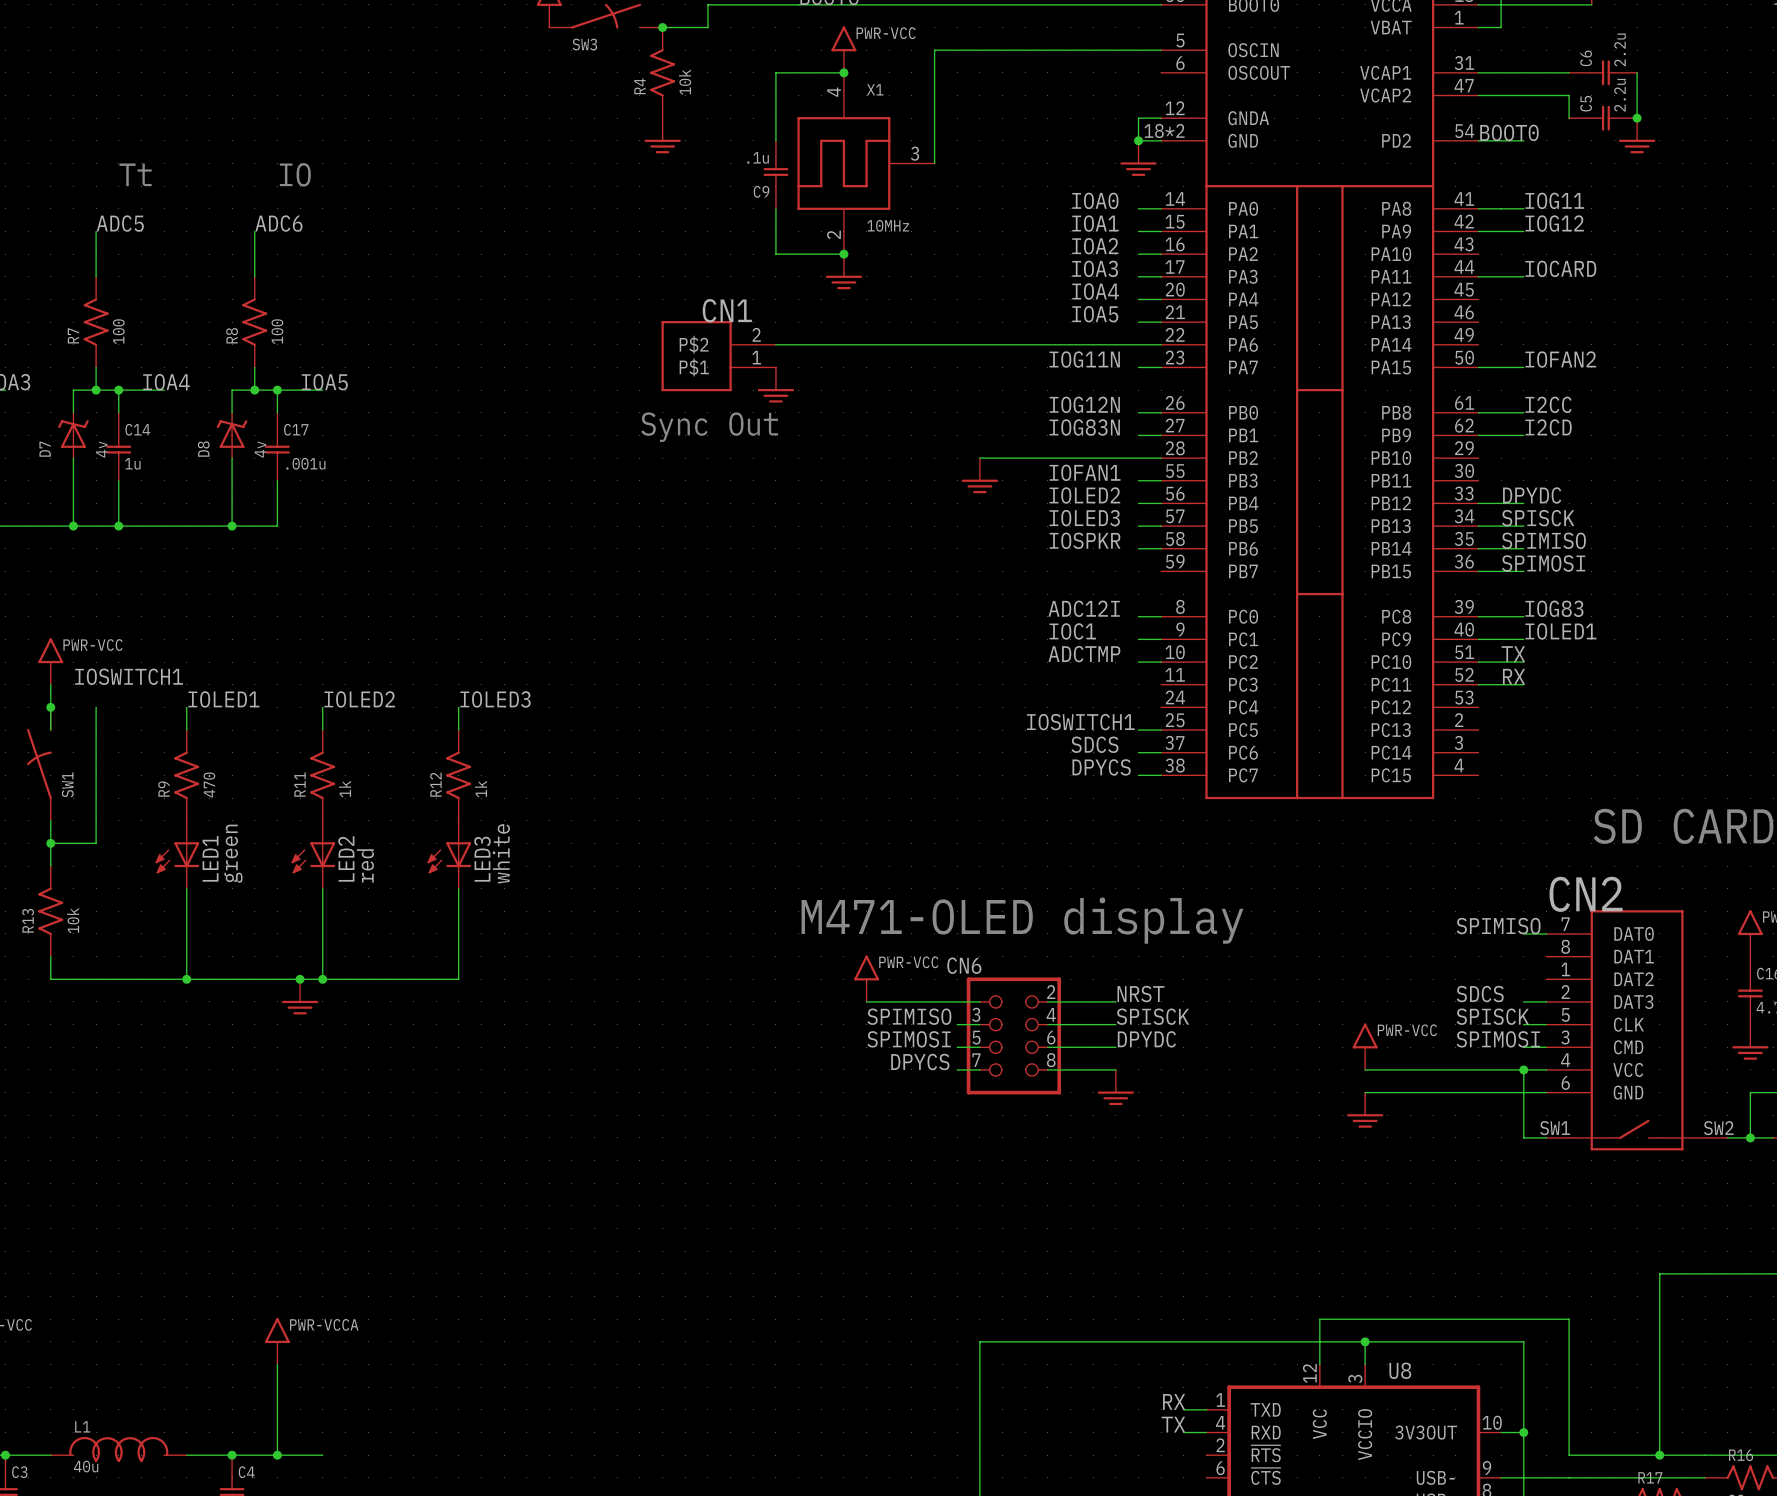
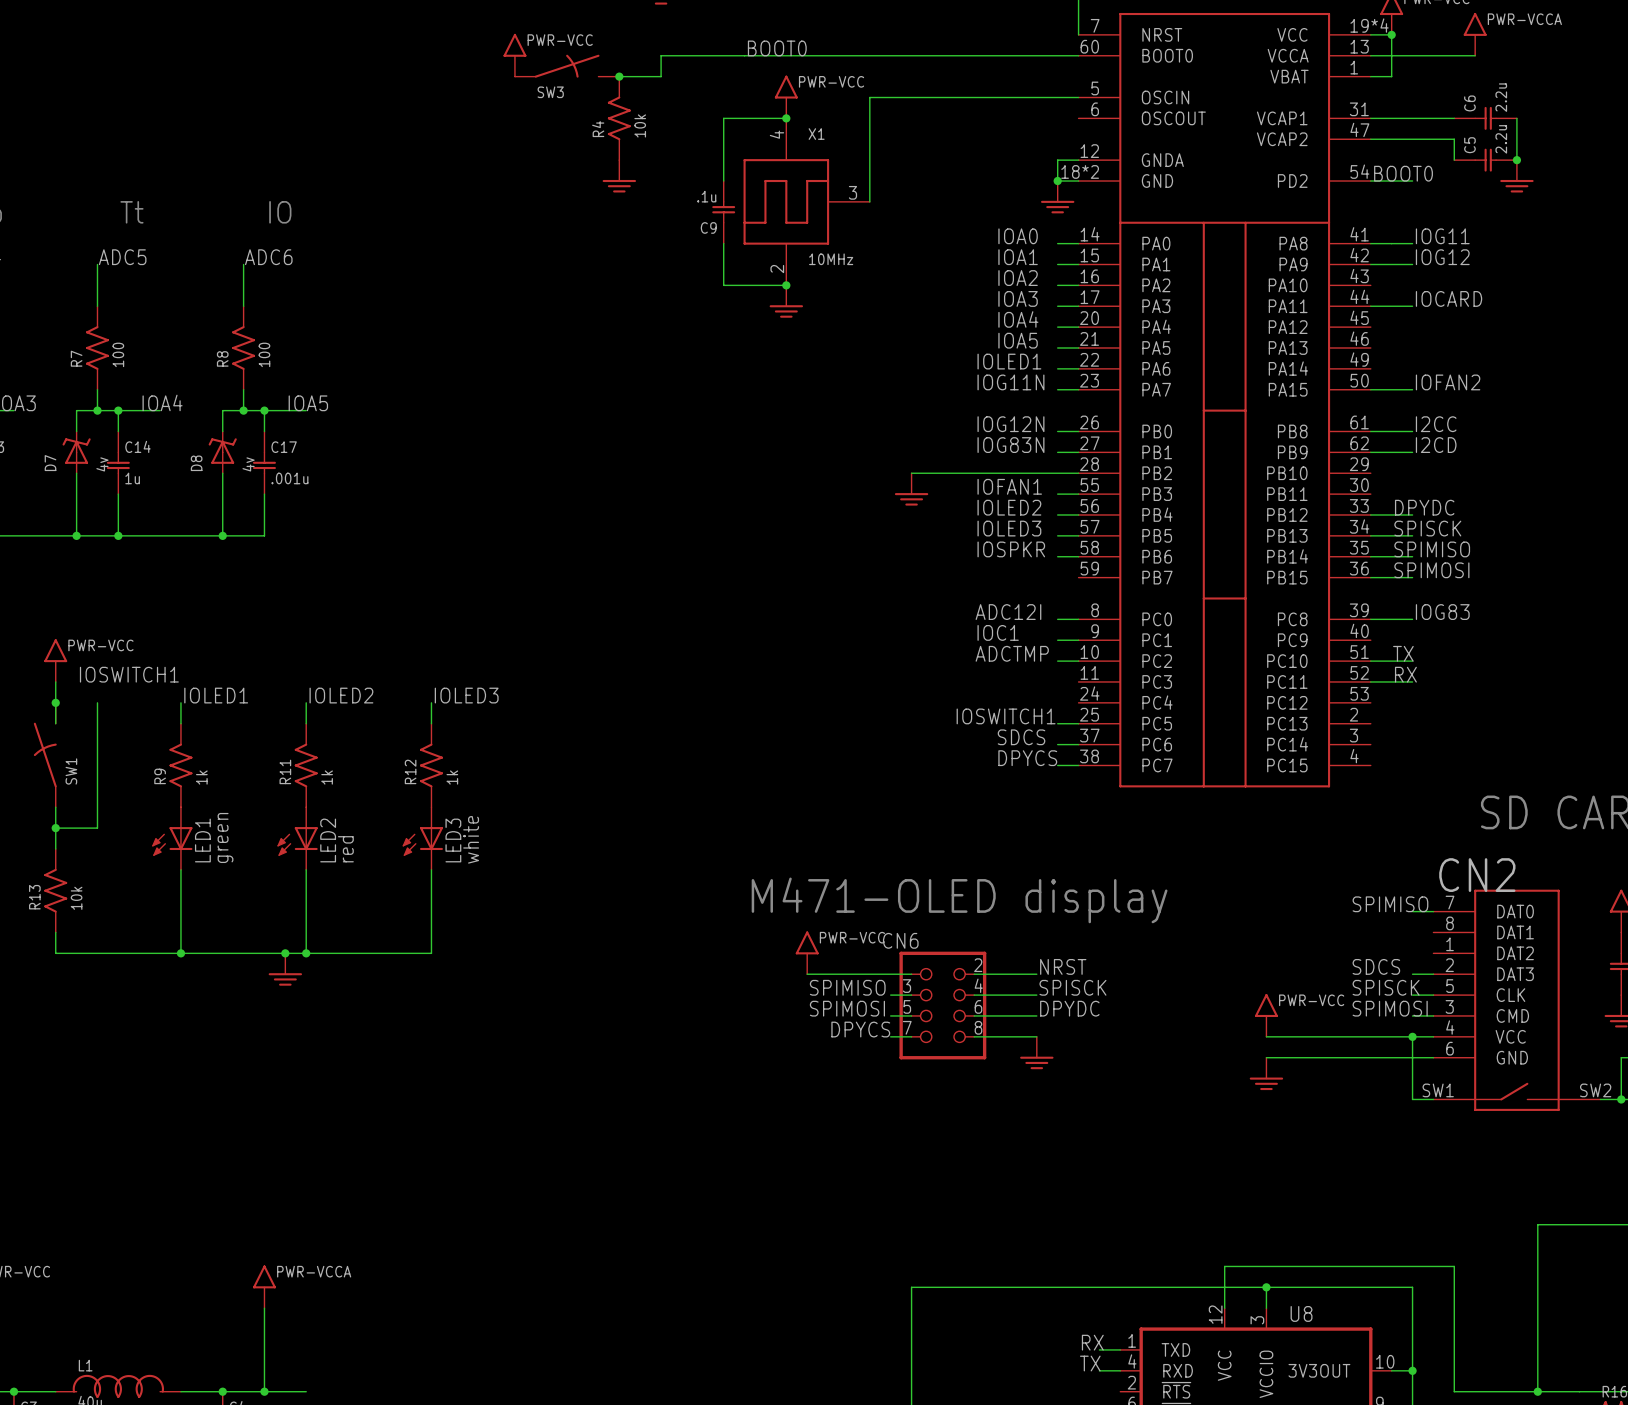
label: none -> IOLED1 (1009, 361)
wire: (775, 344) (1138, 344) -> none
CN1: (718, 356) -> none
power symbol: (775, 385) -> none
text: Sync Out (709, 427) -> none
label: IOLED1 (1560, 631) -> none
wire: (1478, 639) (1523, 639) -> none
R9 value: 470 (209, 785) -> 1k (201, 777)

